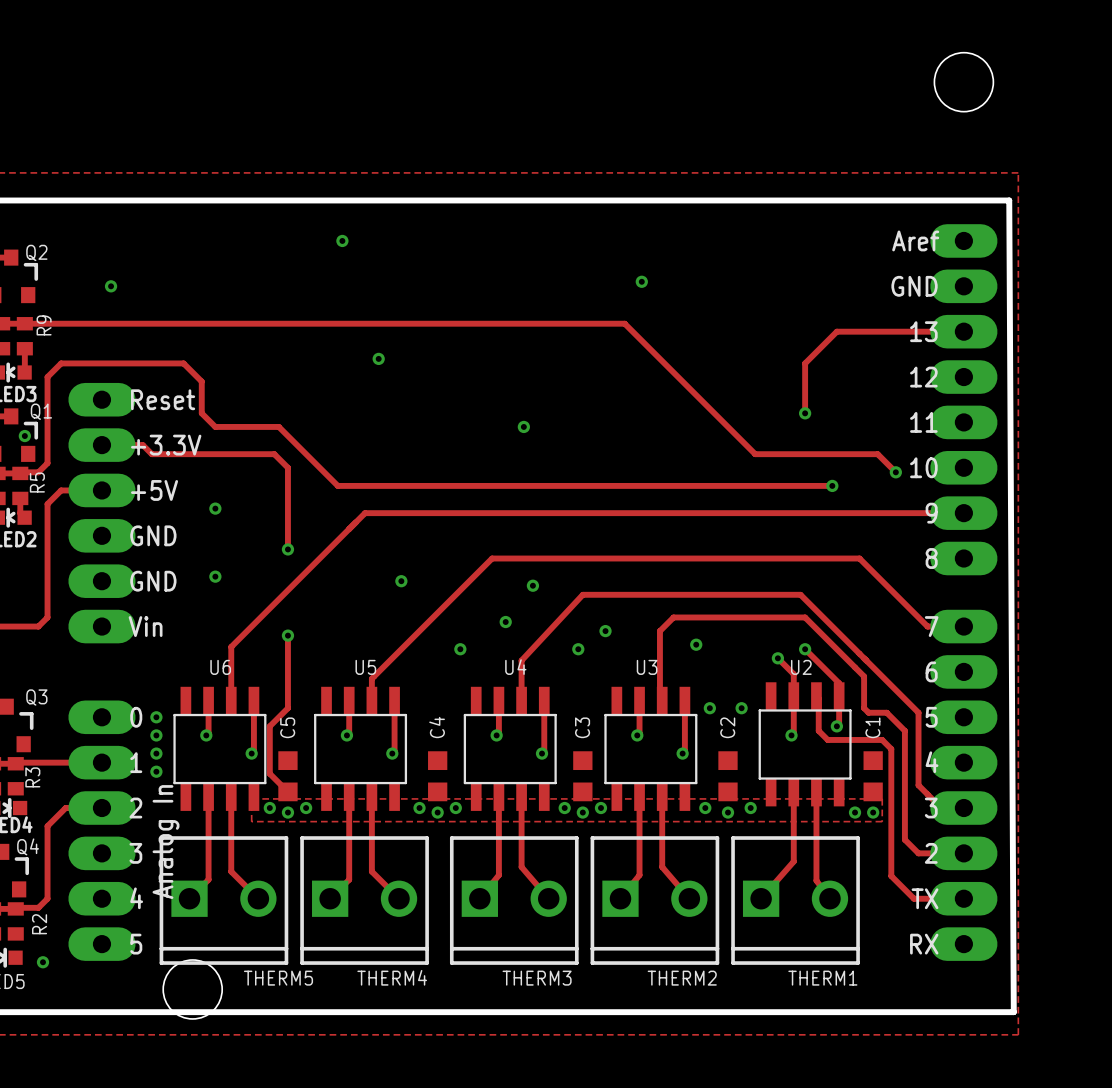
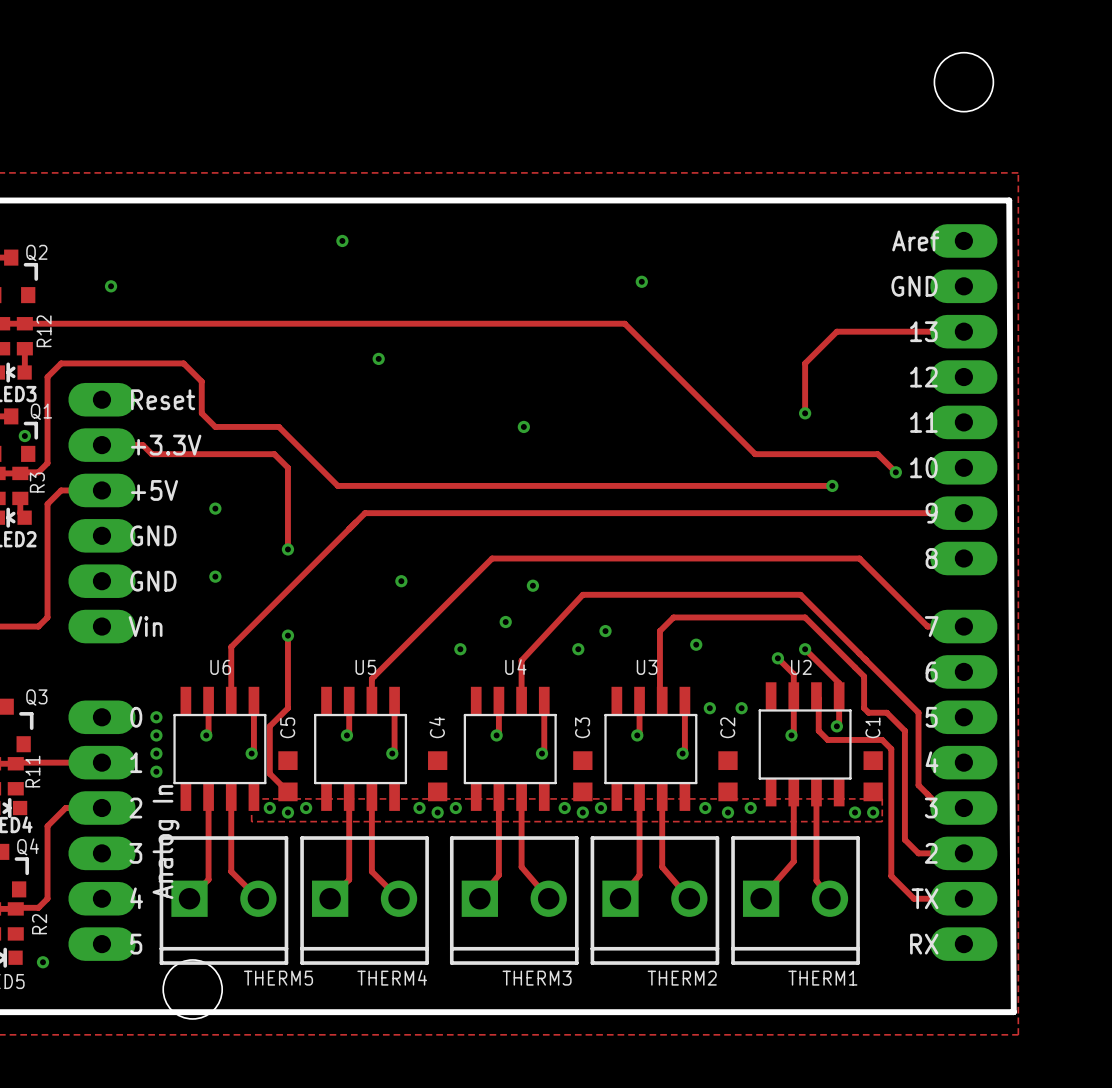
R9 name: R9 (44, 325) -> R12 (44, 331)
R5 name: R5 (37, 482) -> R3 (37, 482)
R3 name: R3 (32, 777) -> R11 (32, 771)

